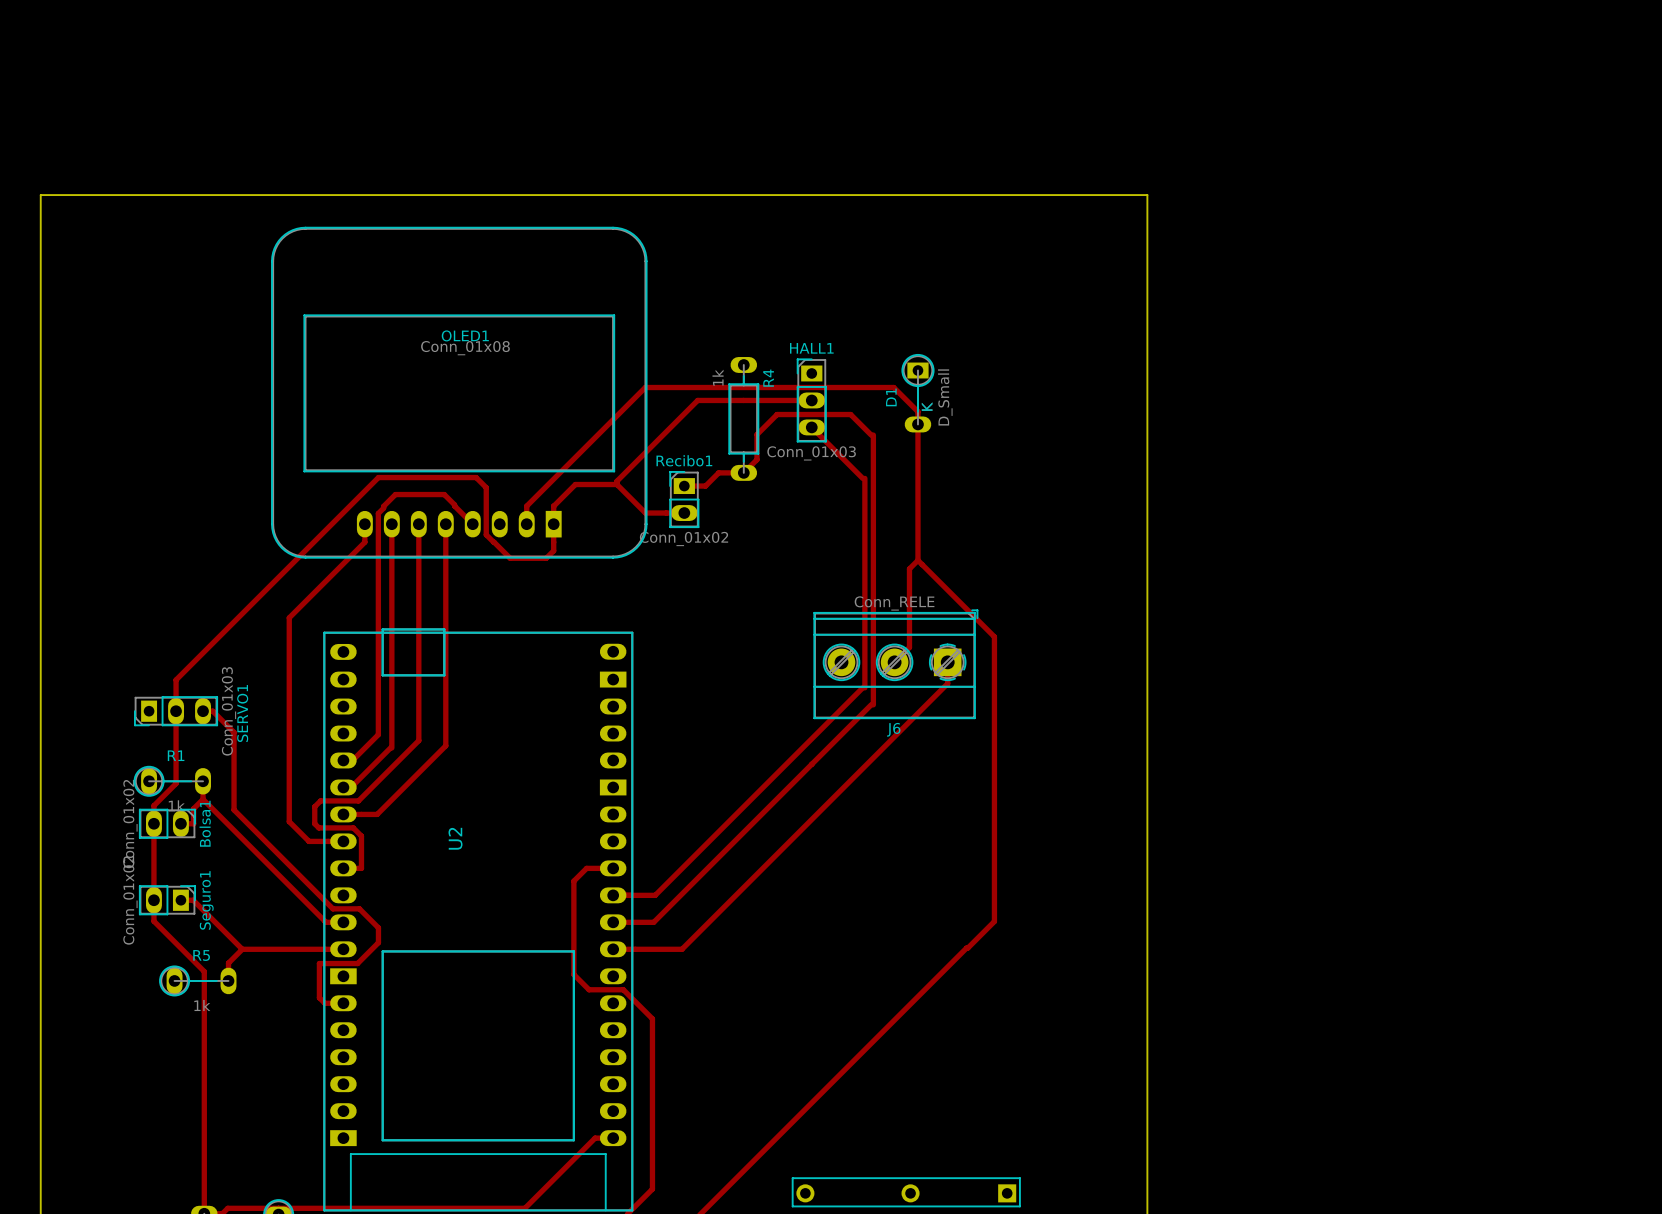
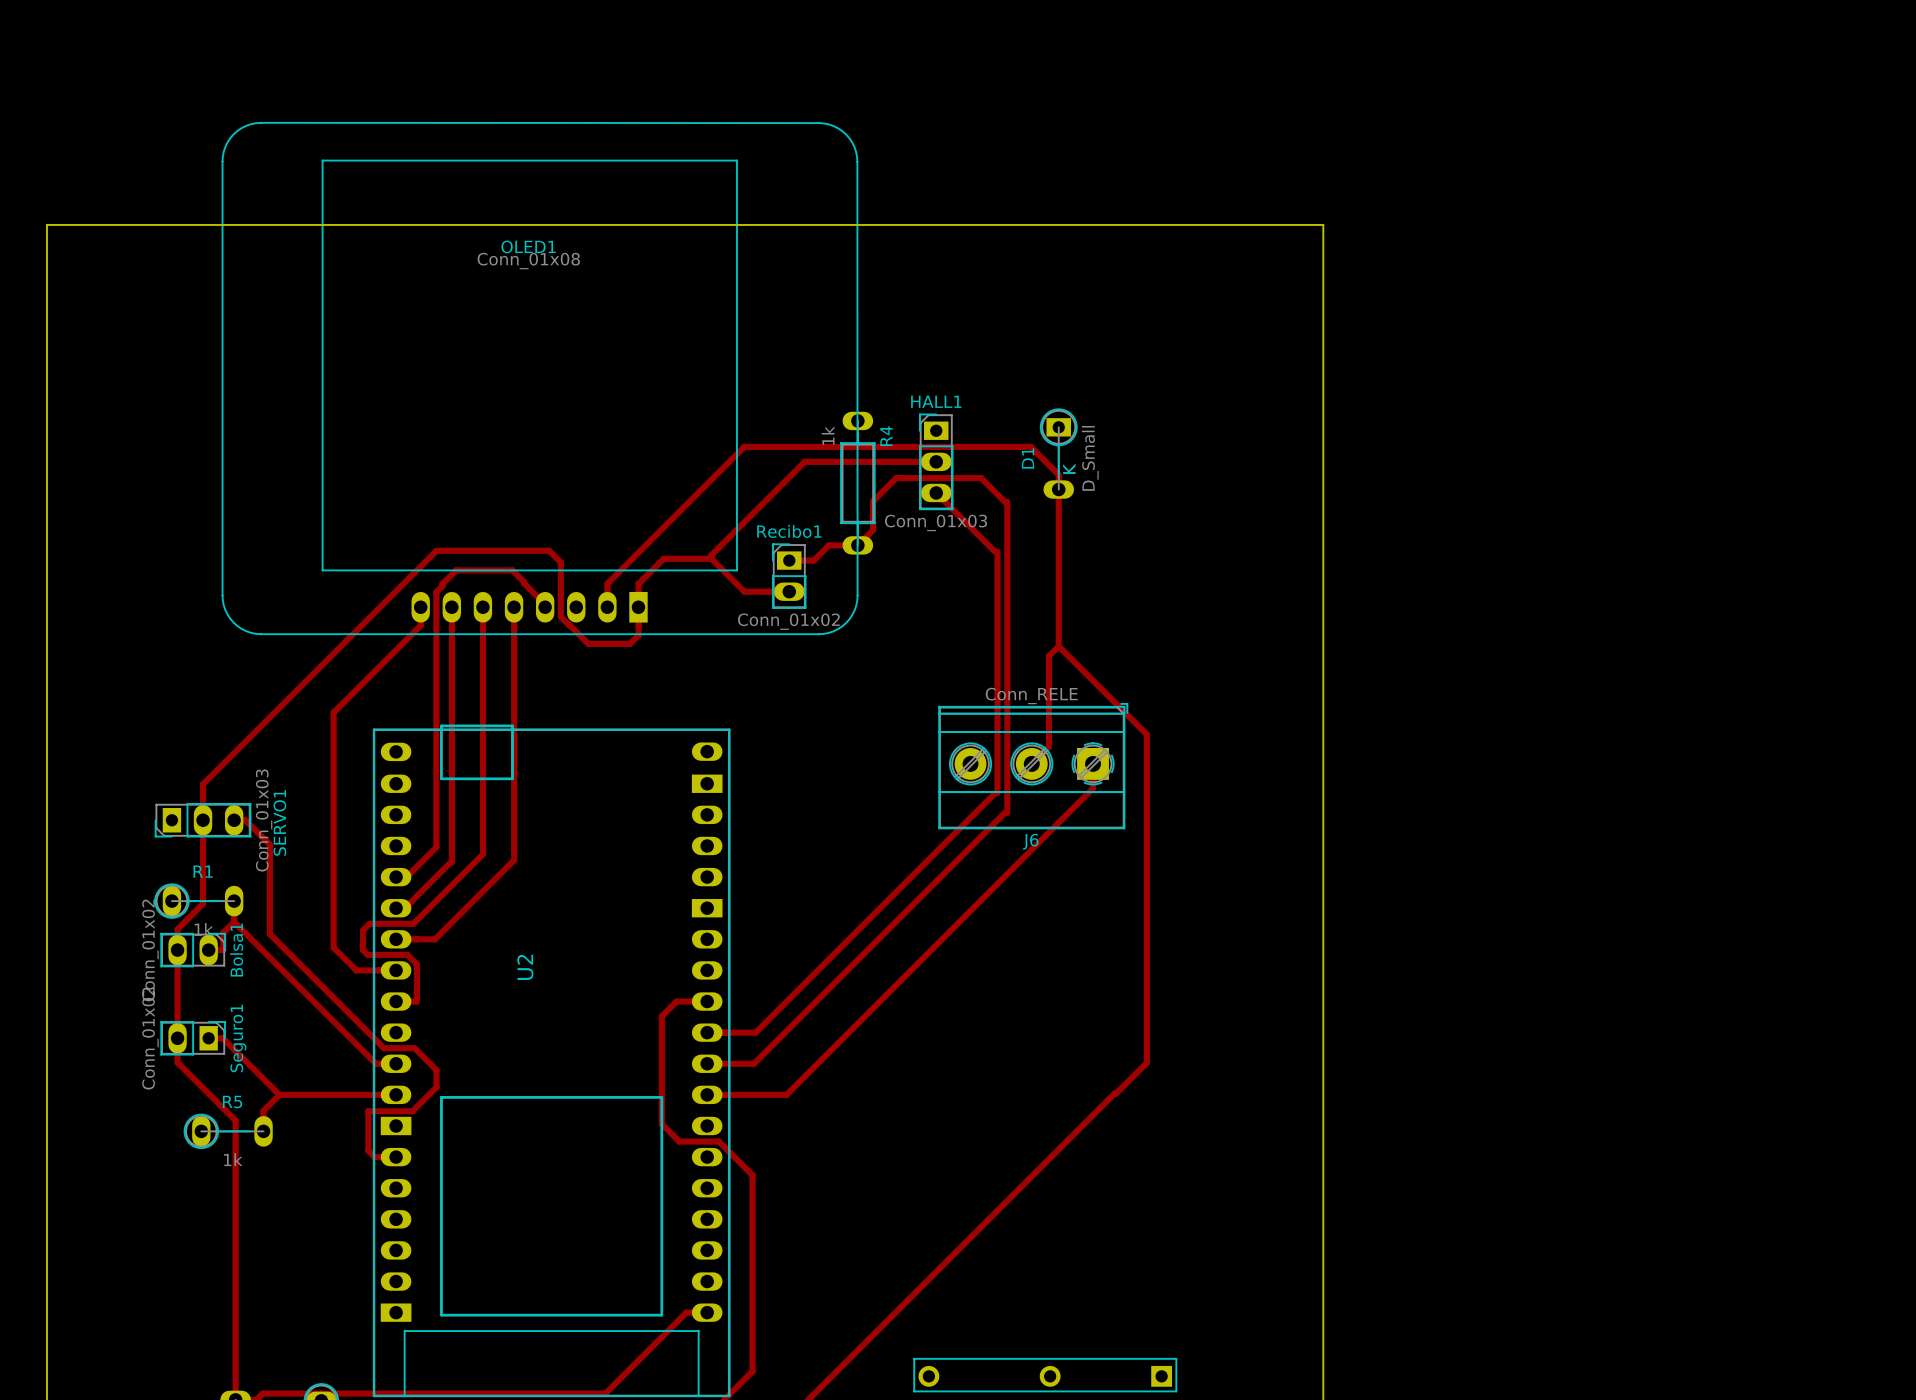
OLED1 footprint: [271, 227, 648, 559] -> [221, 122, 859, 635]
OLED1 name position: OLED1 (465, 335) -> OLED1 (528, 246)
OLED1 value position: Conn_01x08 (465, 348) -> Conn_01x08 (528, 261)

